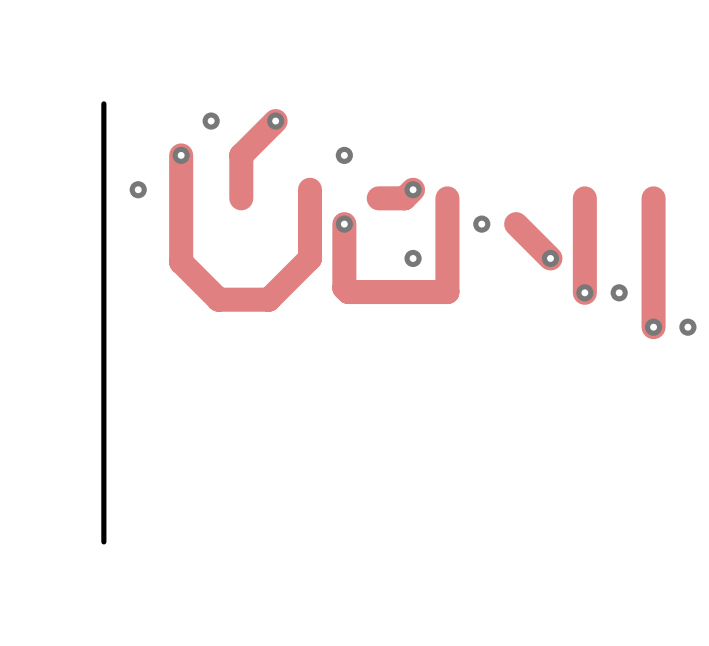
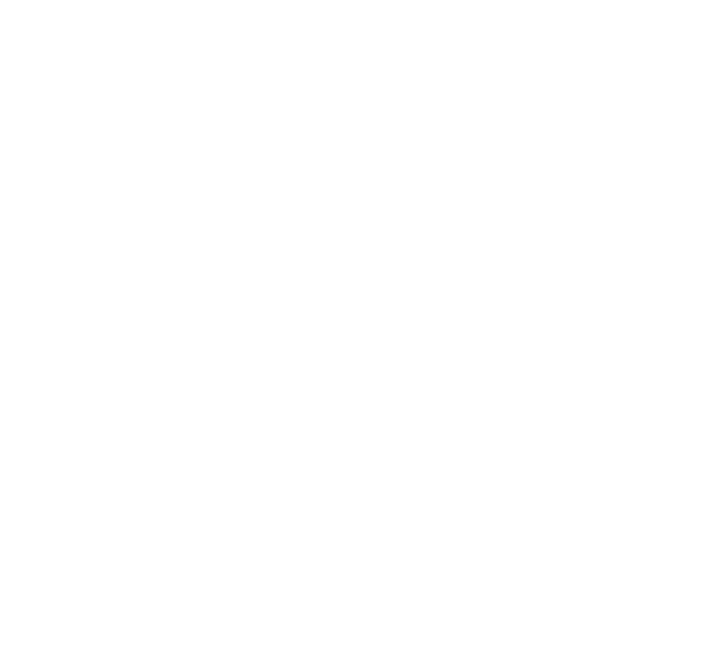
line: (103, 103) (103, 541) -> none
via: (211, 121) -> none
track: (275, 121) (241, 155) (241, 198) -> none
via: (275, 121) -> none
track: (181, 155) (181, 262) (218, 299) (268, 299) (310, 258) (310, 189) -> none
via: (181, 155) -> none
via: (344, 155) -> none
via: (138, 189) -> none
track: (413, 189) (404, 198) (378, 198) -> none
via: (413, 189) -> none
track: (447, 198) (447, 292) (348, 292) (344, 287) (344, 224) -> none
track: (584, 198) (584, 292) -> none
track: (653, 198) (653, 327) -> none
via: (344, 224) -> none
via: (481, 224) -> none
track: (516, 224) (550, 258) -> none
via: (413, 258) -> none
via: (550, 258) -> none
via: (584, 292) -> none
via: (619, 292) -> none
via: (653, 327) -> none
via: (687, 327) -> none

